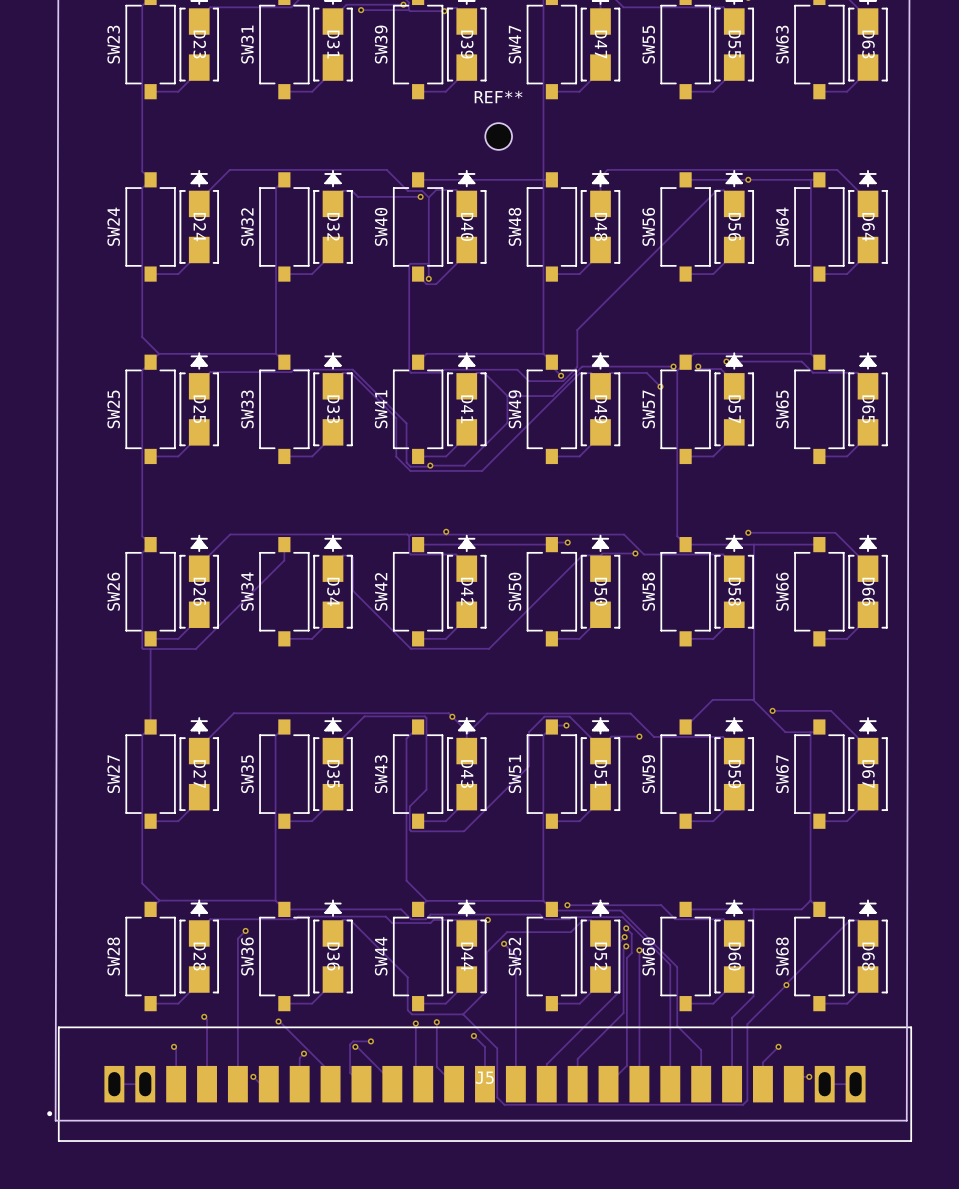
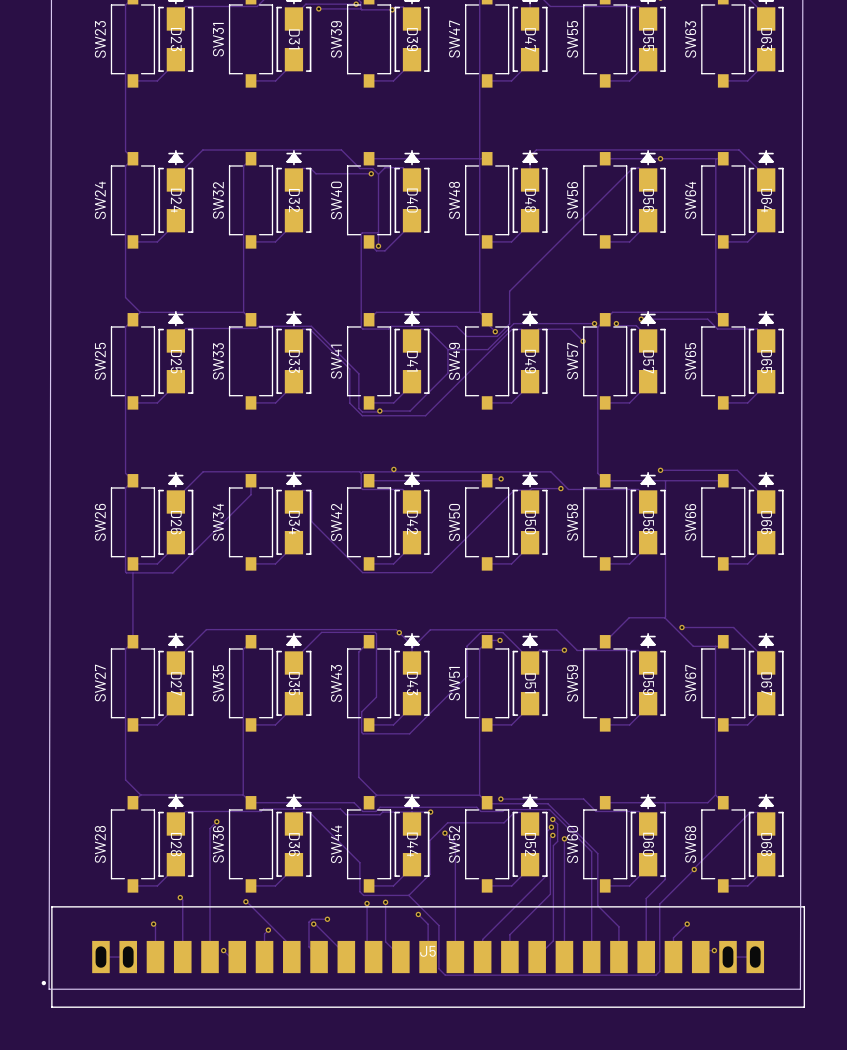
REF**: (498, 136) -> none

